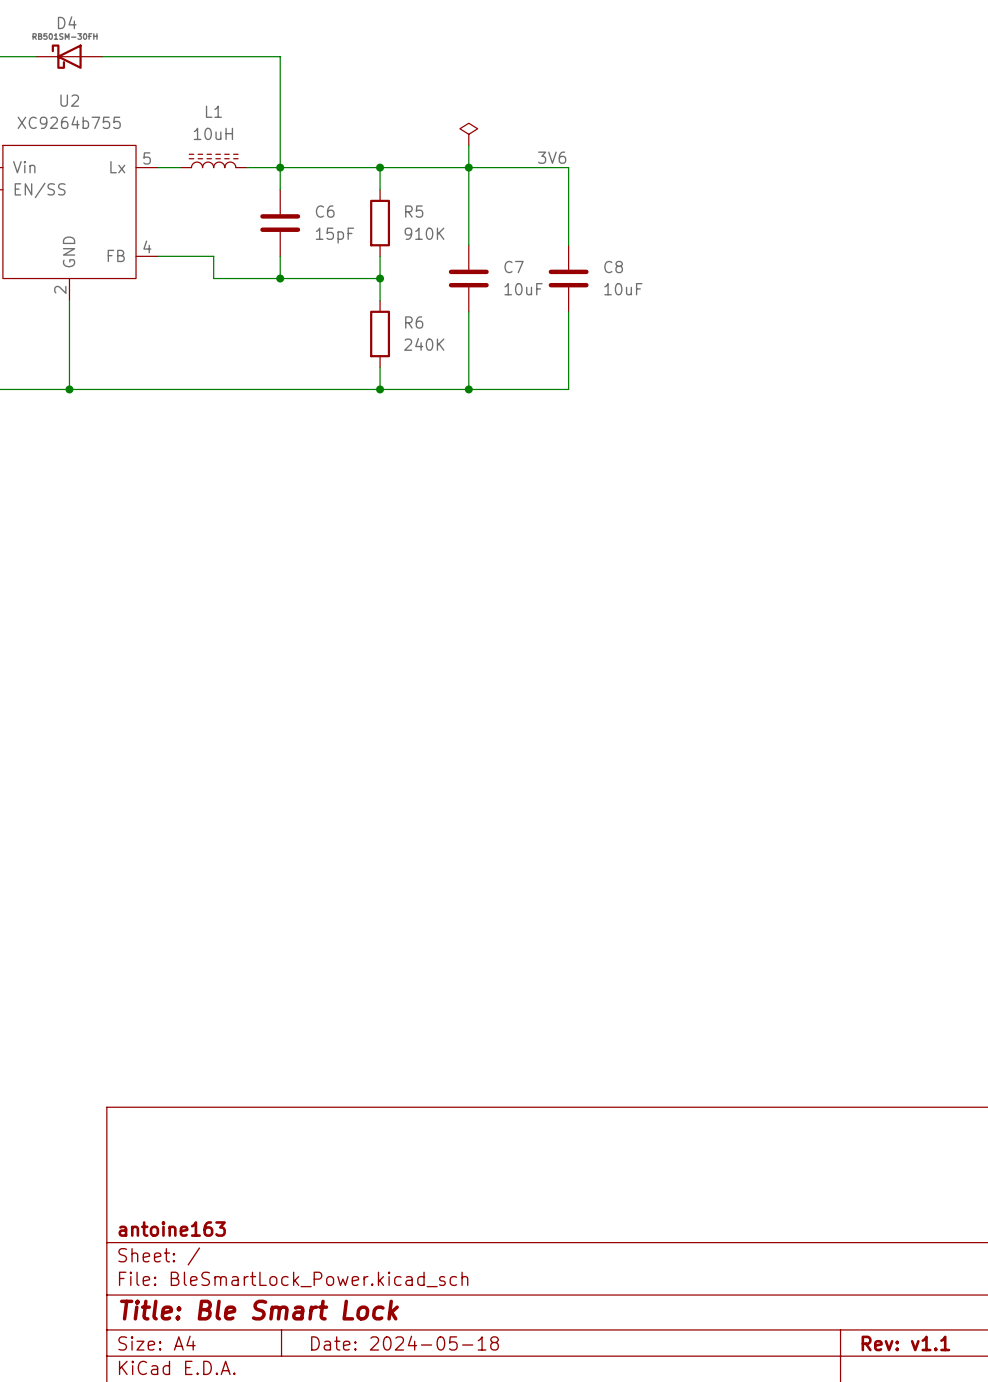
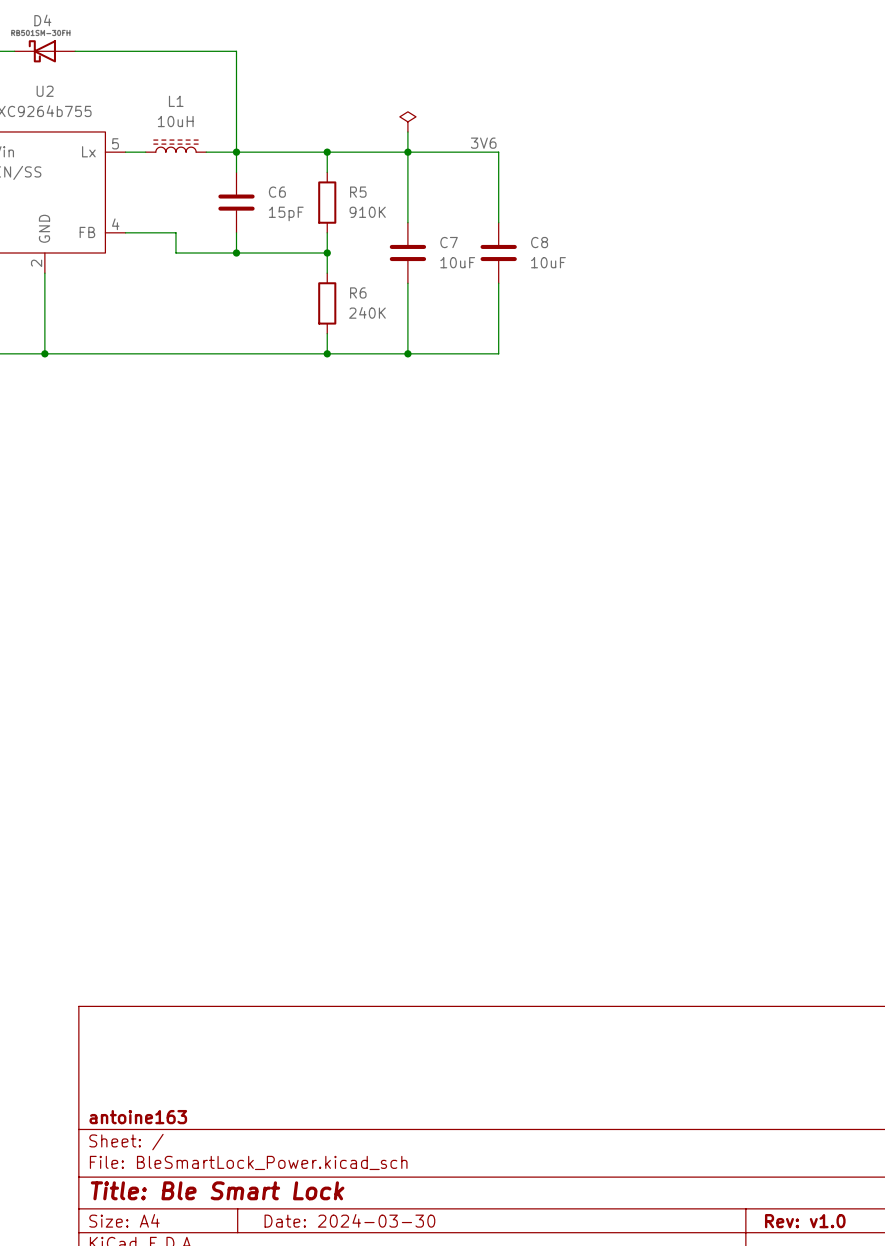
title block: Date: 2024-05-18 (405, 1343) -> Date: 2024-03-30 (349, 1220)
title block: Rev: v1.1 (905, 1343) -> Rev: v1.0 (805, 1221)

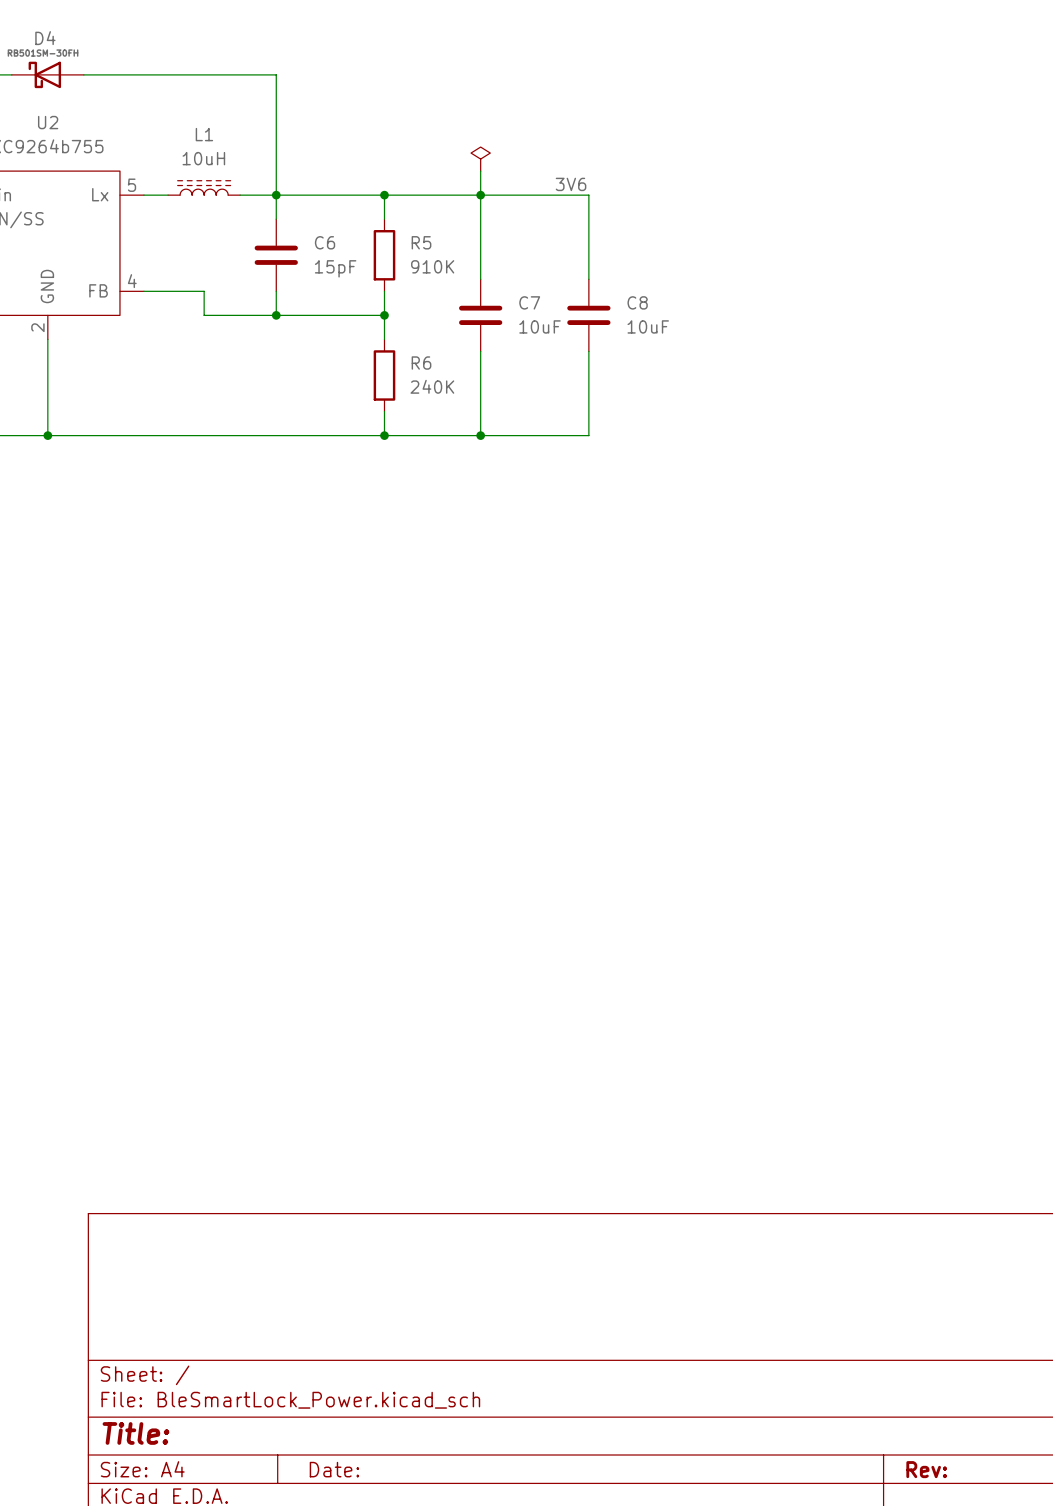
title block: antoine163 (138, 1117) -> none
title block: Title: Ble Smart Lock (217, 1190) -> Title: (135, 1433)
title block: Date: 2024-03-30 (349, 1220) -> Date: (334, 1469)
title block: Rev: v1.0 (805, 1221) -> Rev: (926, 1469)

